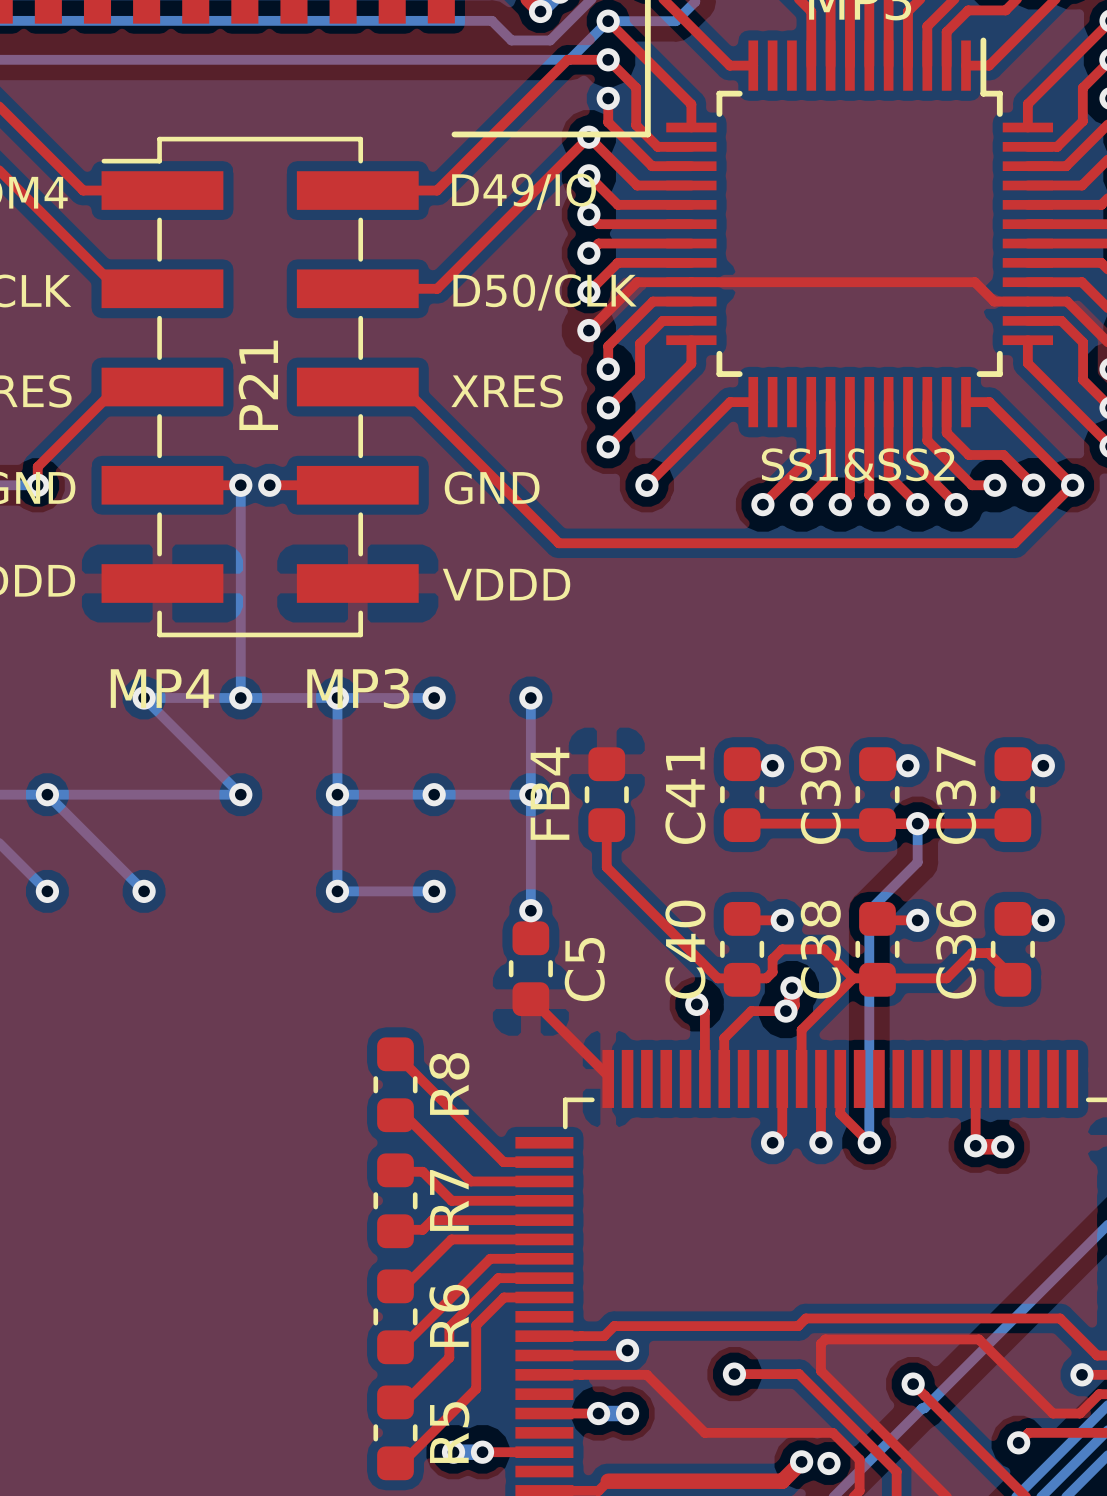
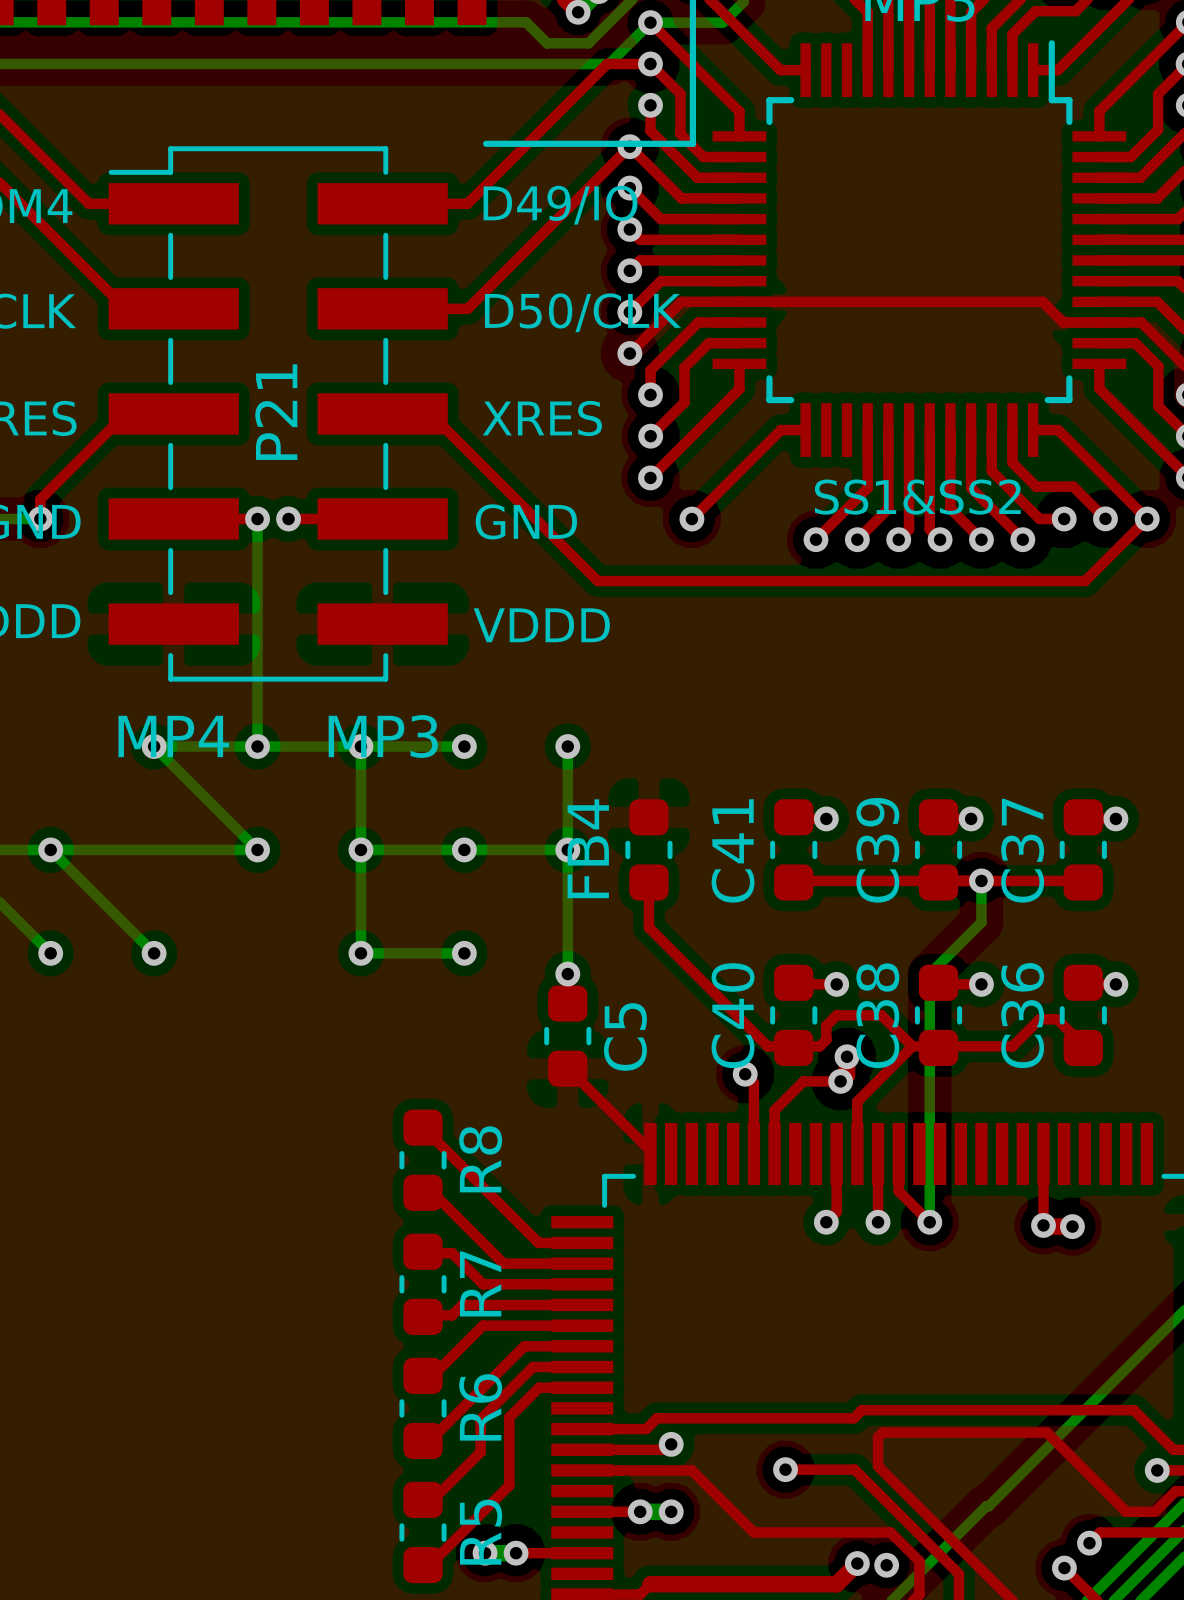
top track: (913, 1384) (995, 1466) -> none
via position: (913, 1384) -> (1064, 1568)

